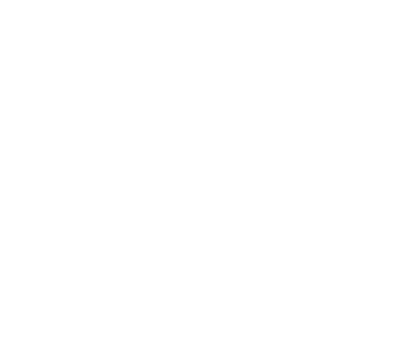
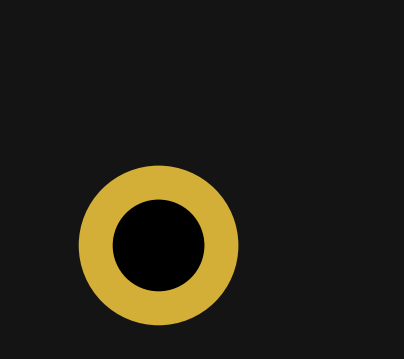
part: none -> (158, 245)

